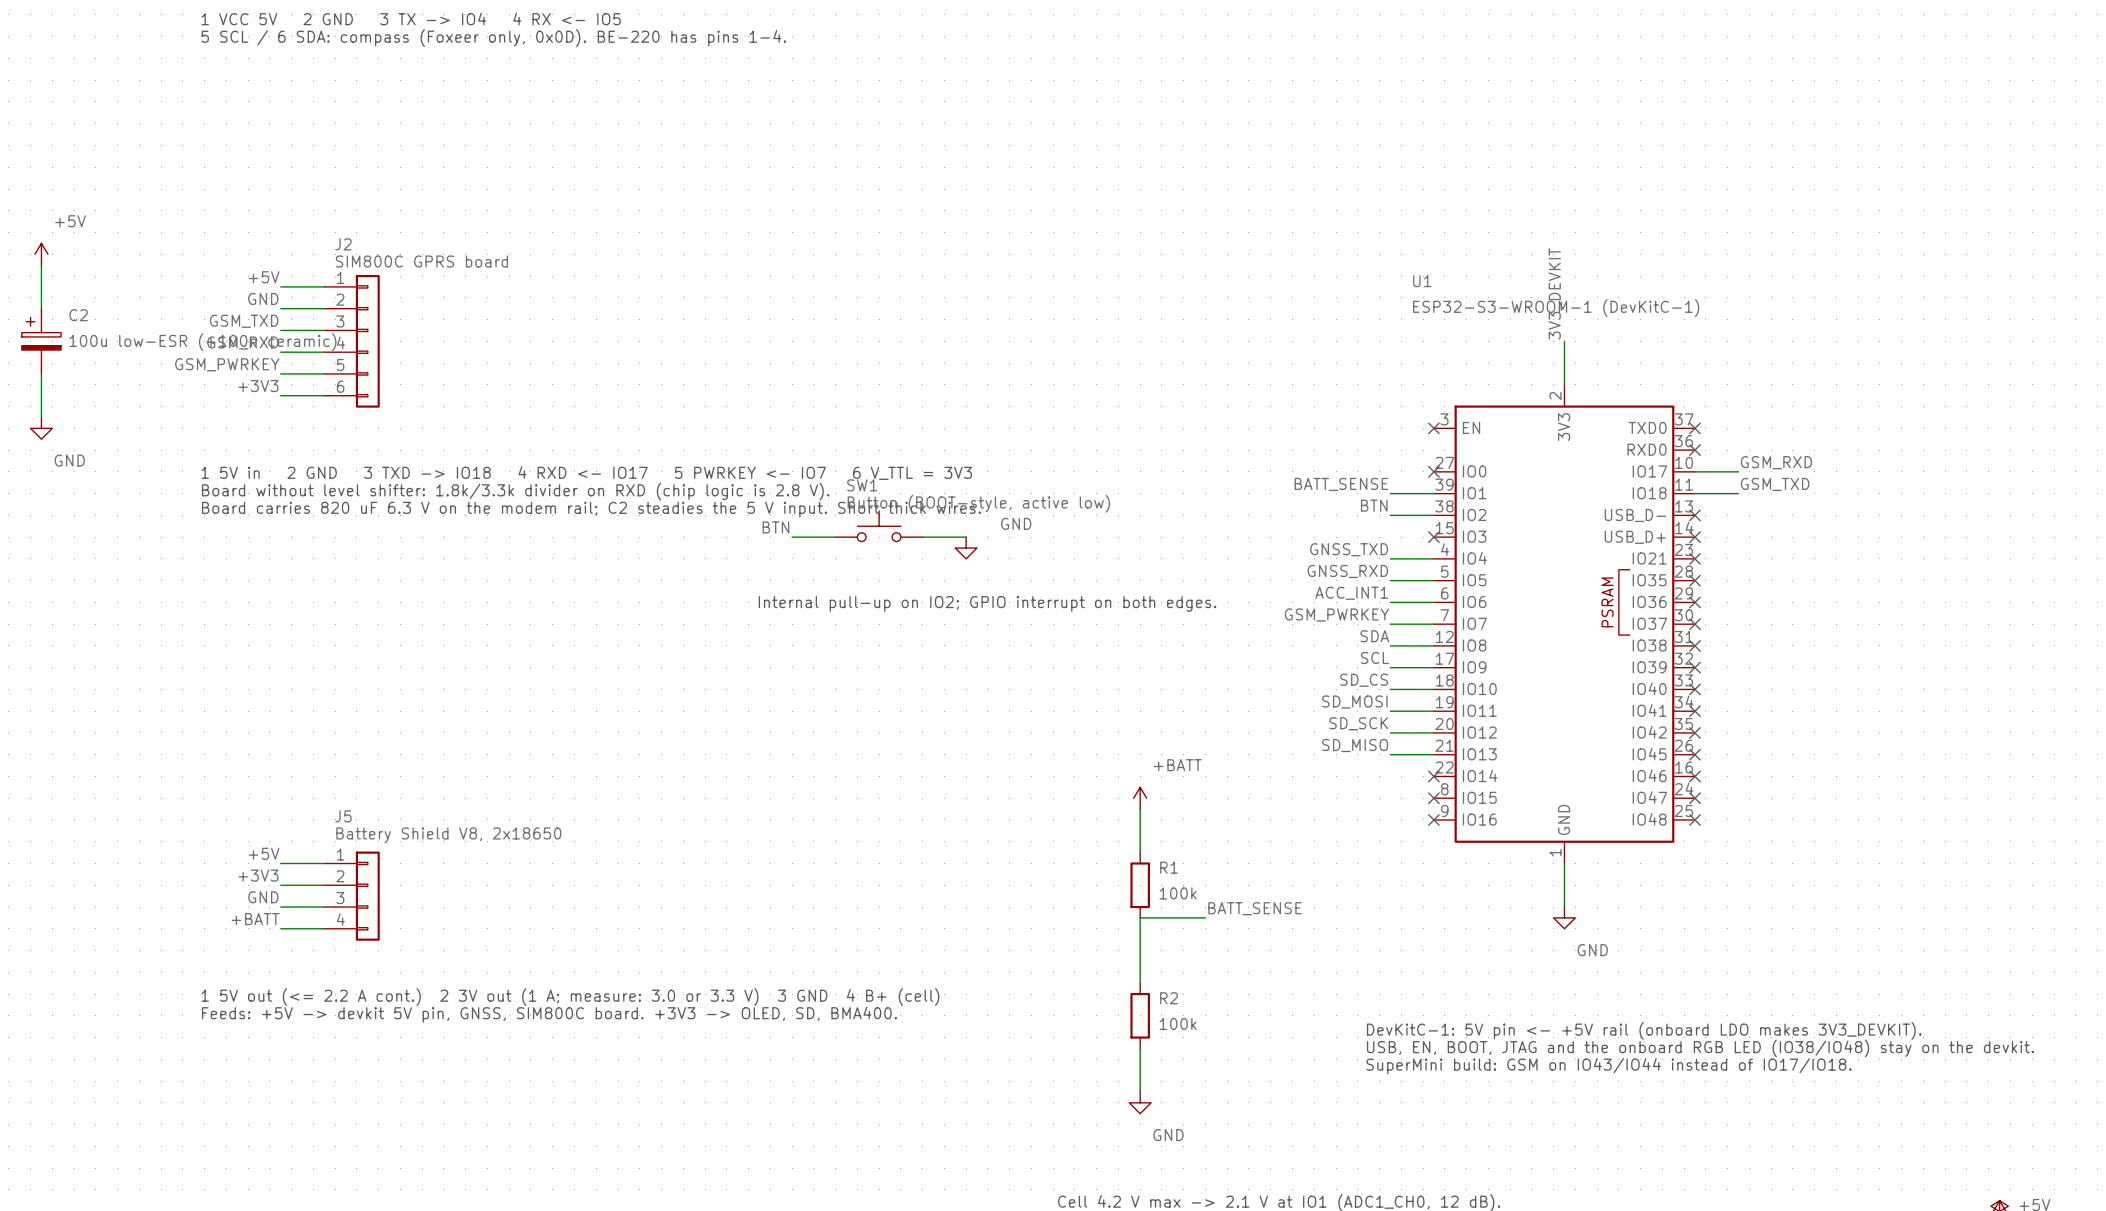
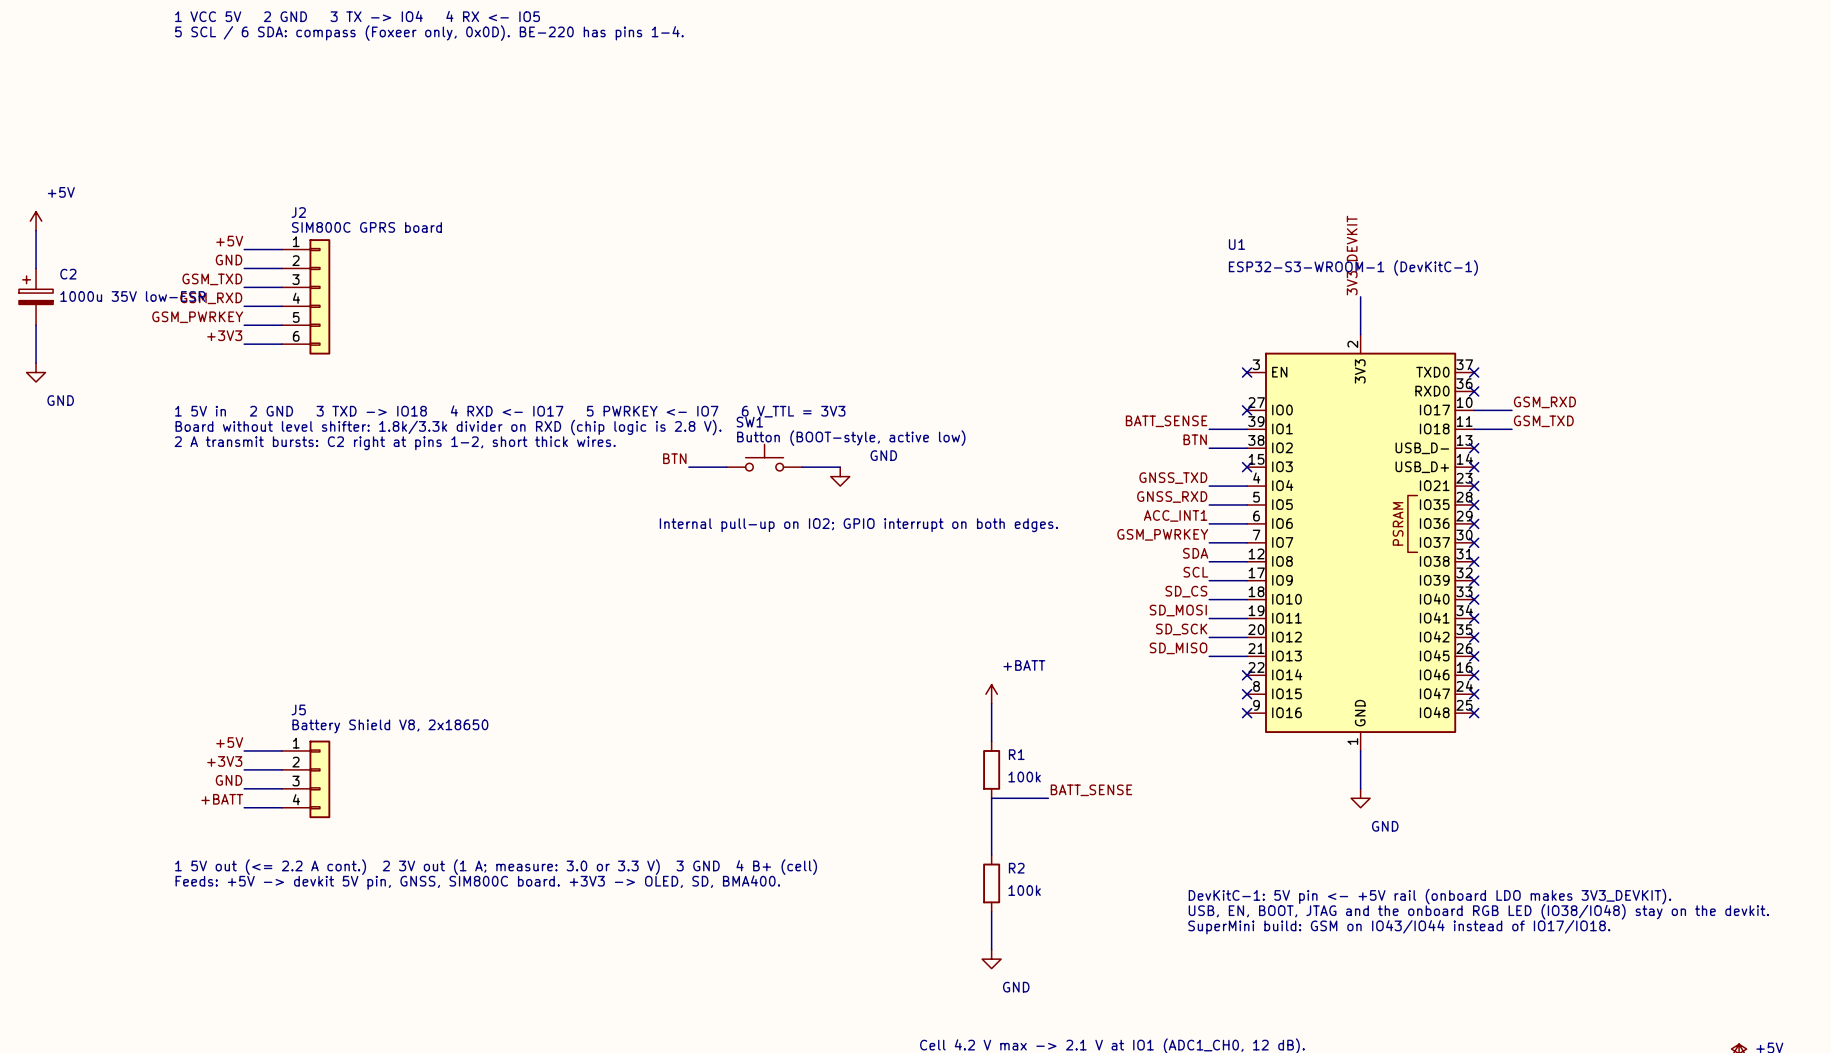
C2 value: 100u low-ESR (+100n ceramic) (202, 342) -> 1000u 35V low-ESR (132, 296)
text: Board carries 820 uF 6.3 V on the modem rail; C2 steadies the 5 V input. Short thick wires. (591, 509) -> 2 A transmit bursts: C2 right at pins 1-2, short thick wires. (395, 443)

